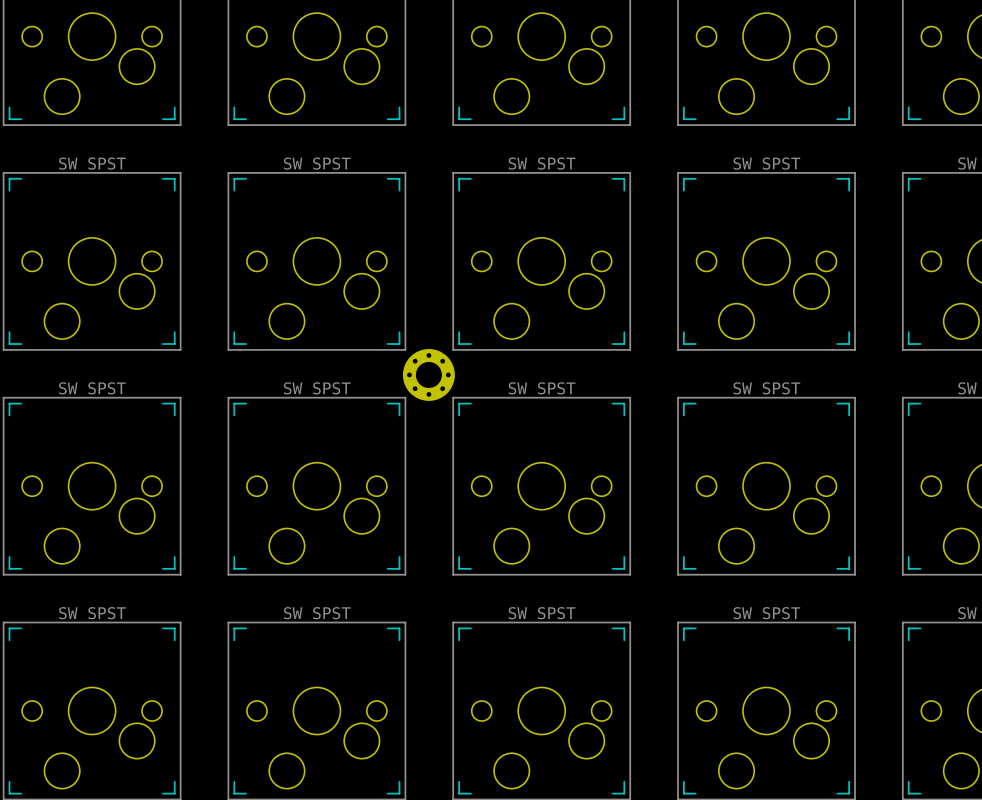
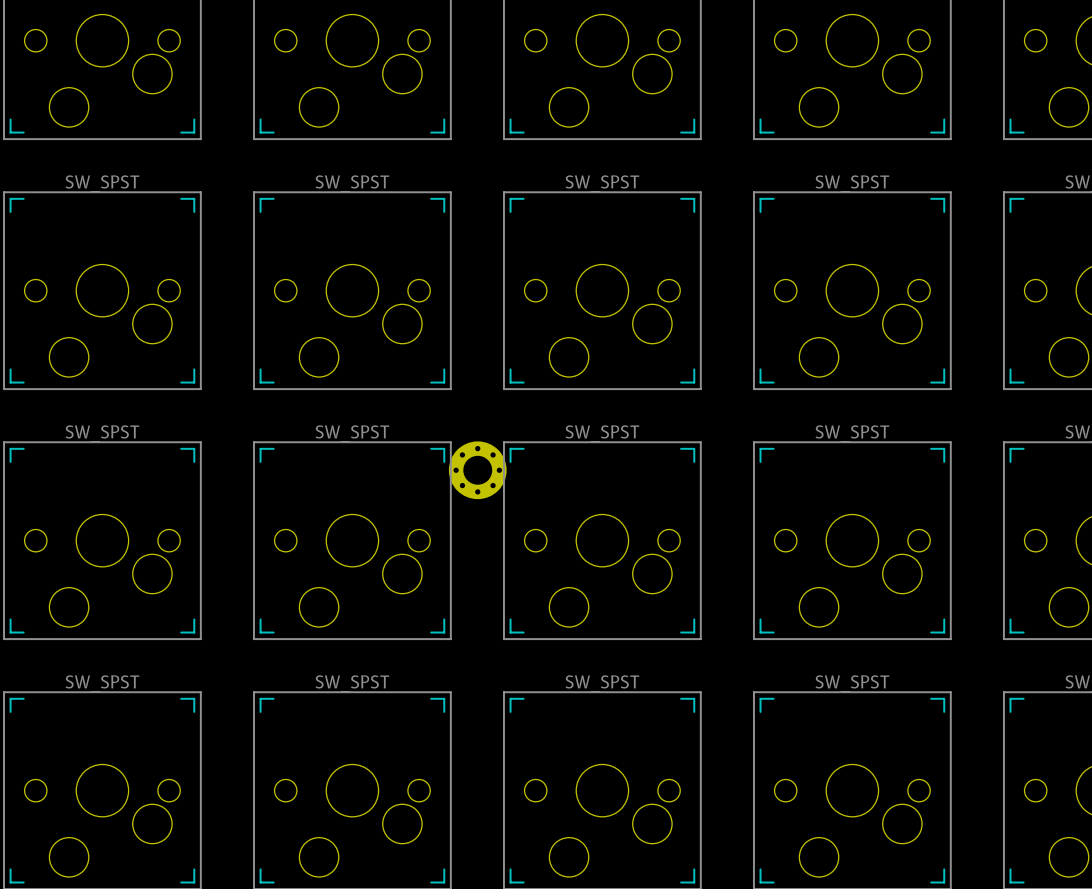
part position: (428, 374) -> (477, 470)

